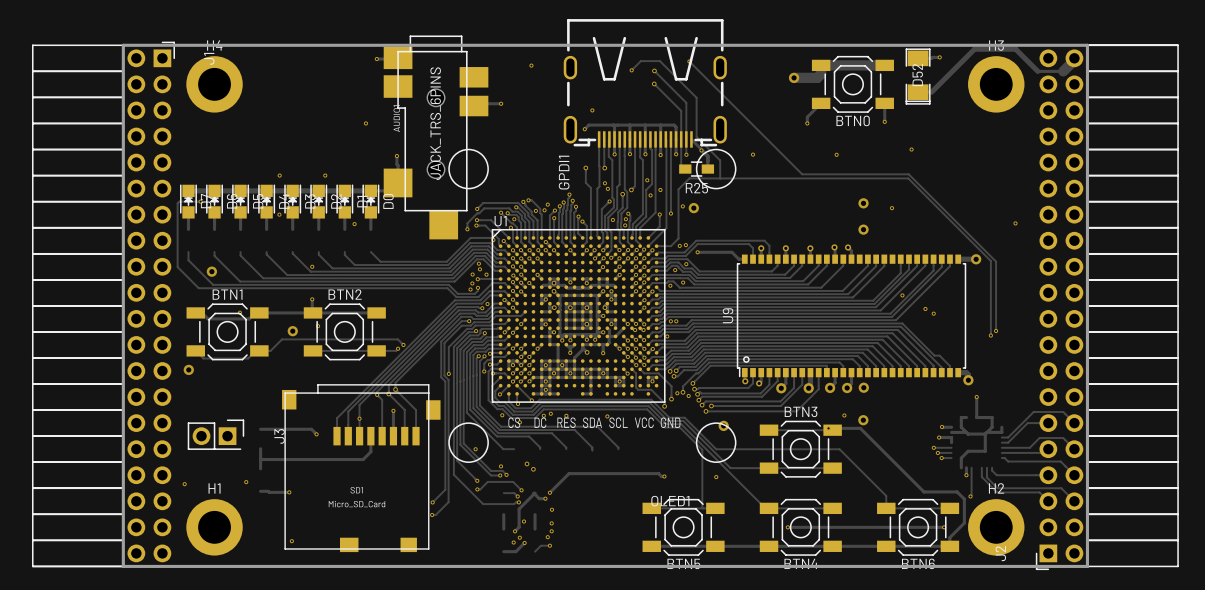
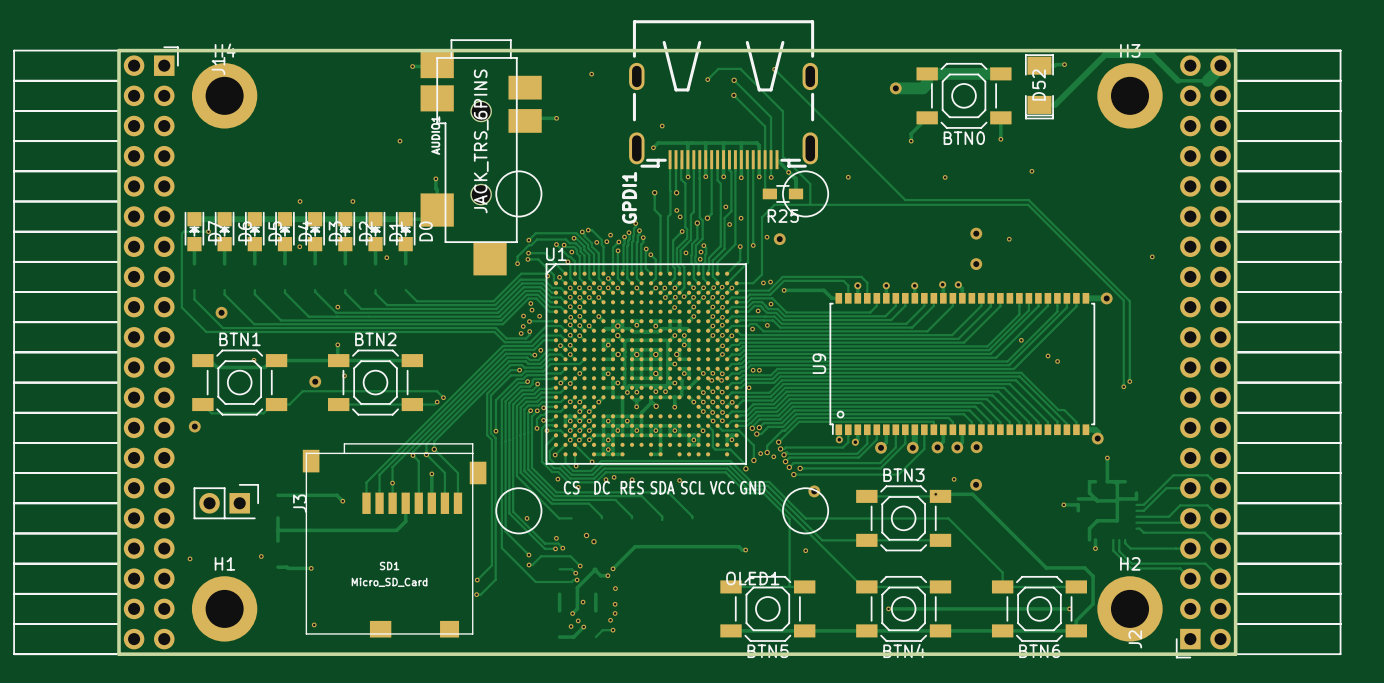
track: none -> (1114, 481) (1117, 484) (1117, 500)
track: (992, 417) (992, 427) (986, 432) -> none
track: (942, 426) (951, 427) -> none
via: (942, 426) -> none
track: (933, 447) (951, 447) -> none
via: (933, 447) -> none
track: (937, 452) (951, 452) -> none
via: (937, 452) -> none
track: (941, 458) (951, 458) -> none
via: (941, 458) -> none
track: (971, 467) (970, 496) -> none
via: (970, 496) -> none

